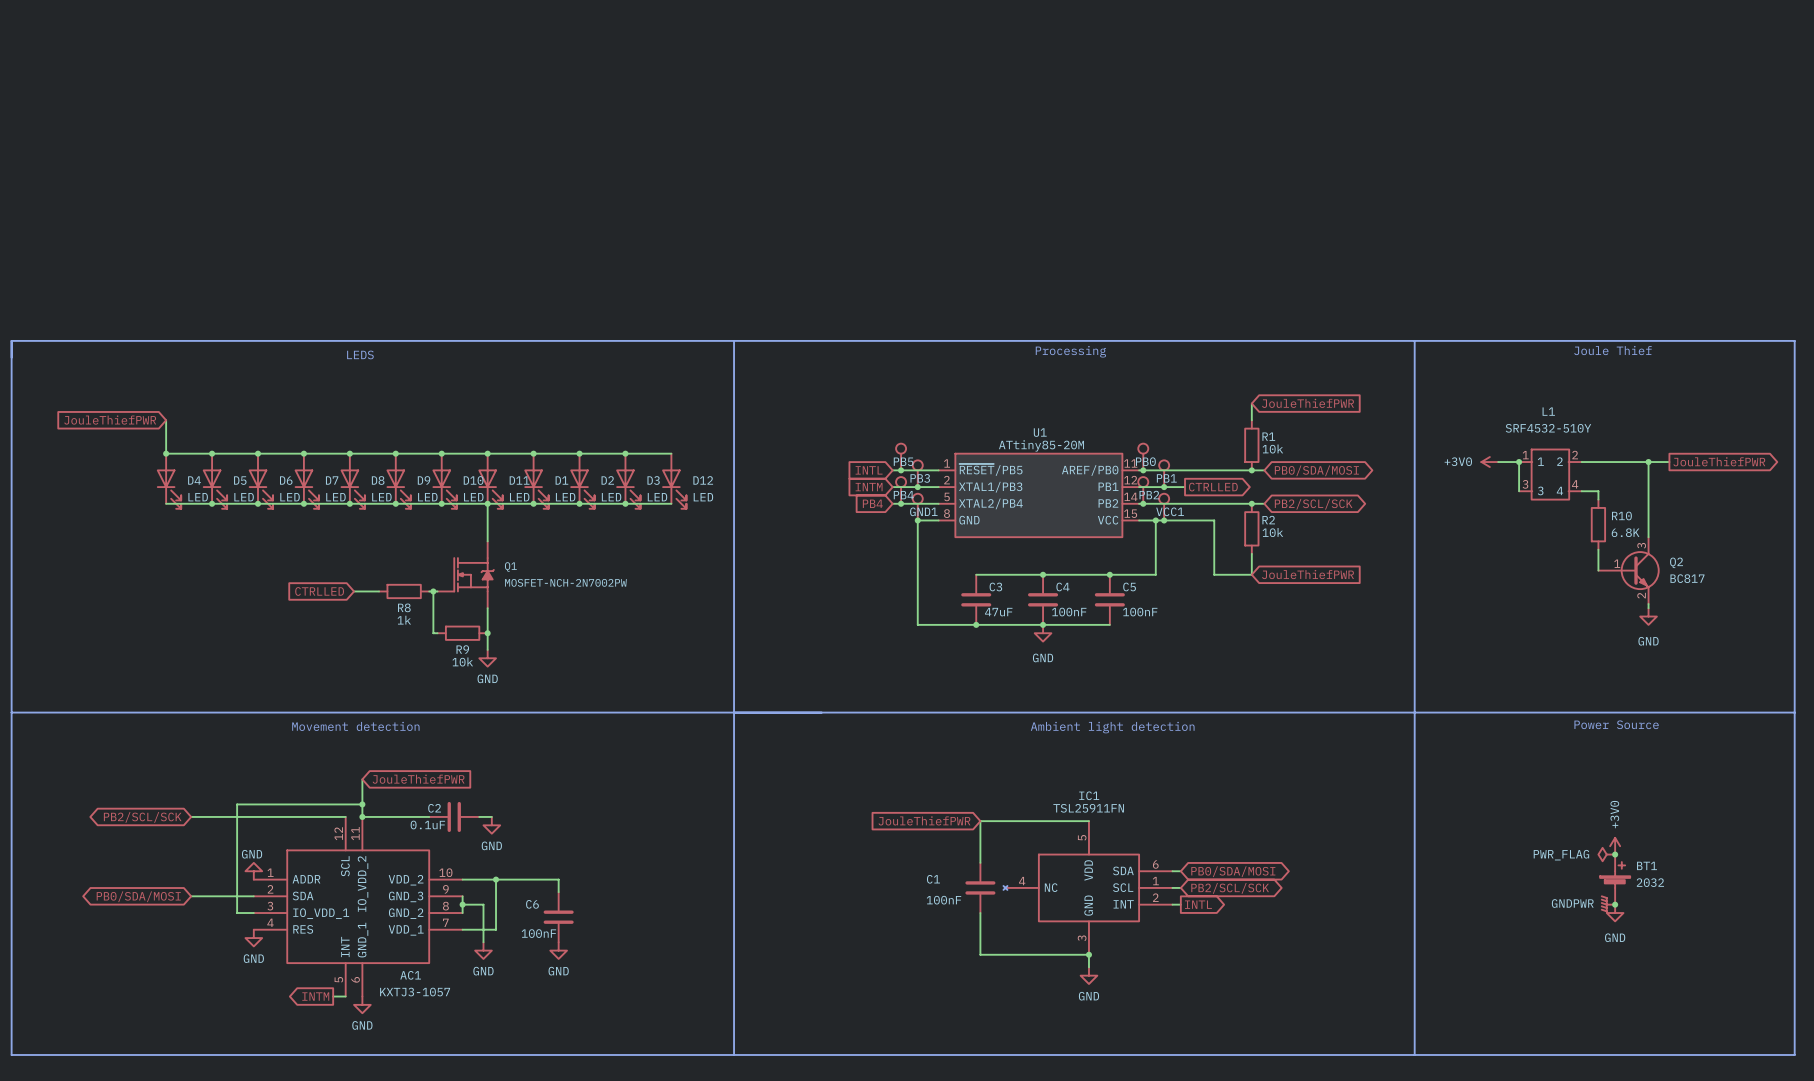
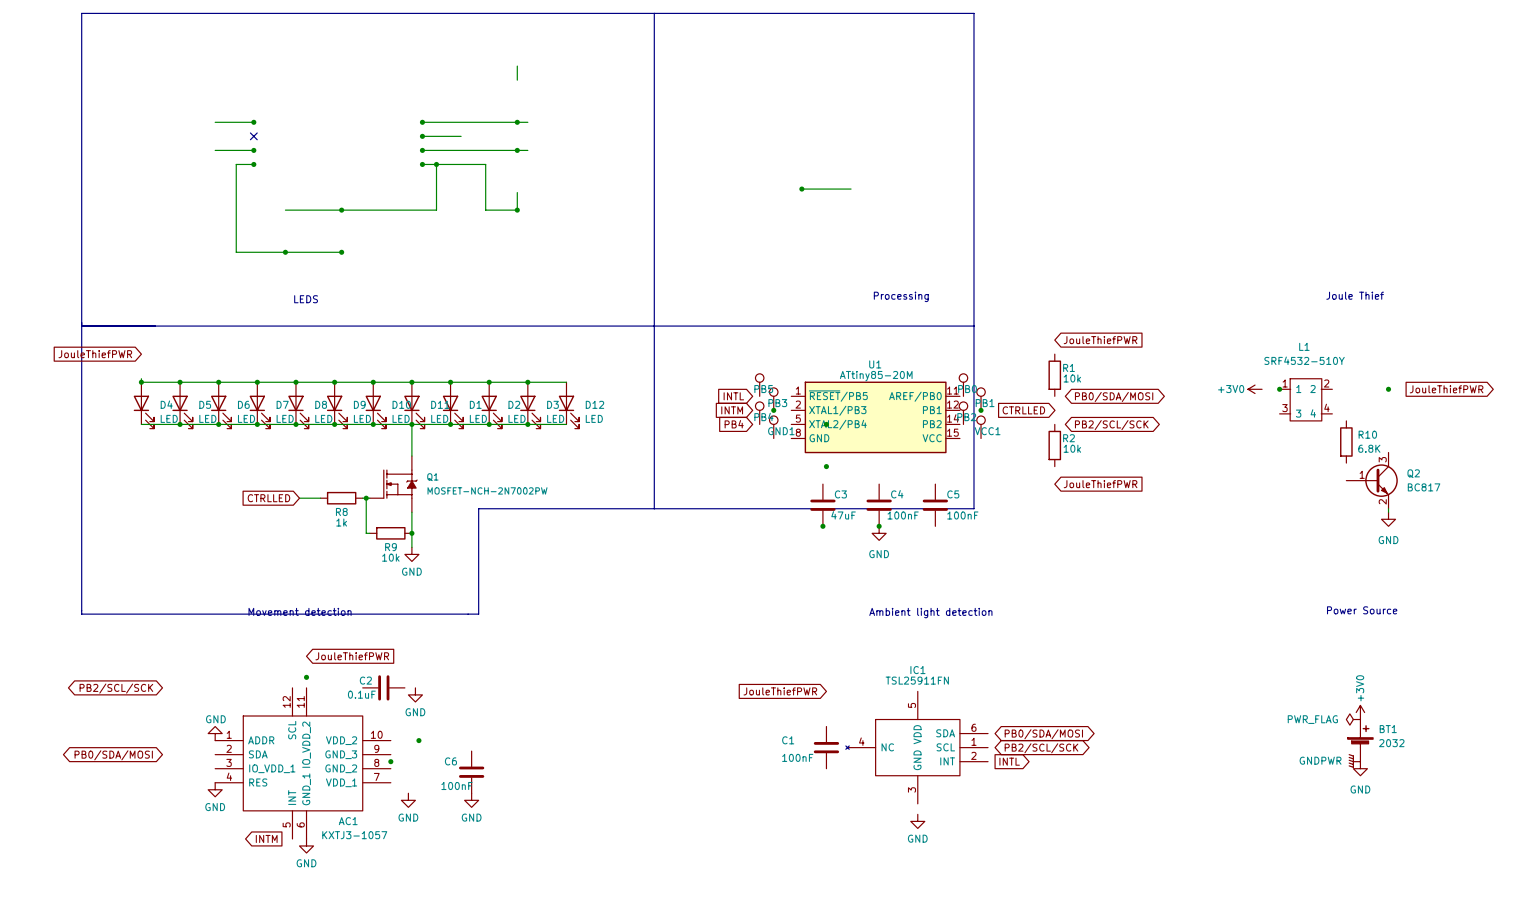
line: none -> (81, 13) (81, 614) (478, 614) (478, 508) (973, 508) (973, 13) (81, 13)
line: none -> (654, 13) (654, 508)
wire: none -> (517, 66) (517, 80)
wire: none -> (215, 122) (253, 122)
junction: none -> (253, 122)
wire: none -> (422, 122) (527, 122)
junction: none -> (422, 122)
junction: none -> (517, 122)
no-connect mark: none -> (253, 136)
wire: none -> (422, 136) (461, 136)
junction: none -> (422, 136)
wire: none -> (215, 150) (253, 150)
junction: none -> (253, 150)
wire: none -> (422, 150) (527, 150)
junction: none -> (422, 150)
junction: none -> (517, 150)
wire: none -> (253, 164) (236, 164) (236, 252) (341, 252)
junction: none -> (253, 164)
wire: none -> (422, 164) (485, 164) (485, 210) (517, 210) (517, 192)
junction: none -> (422, 164)
wire: none -> (436, 164) (436, 210) (285, 210)
junction: none -> (436, 164)
wire: none -> (801, 189) (851, 189)
junction: none -> (801, 189)
junction: none -> (341, 210)
junction: none -> (517, 210)
junction: none -> (285, 252)
junction: none -> (341, 252)
line: (11, 340) (11, 1054) (1794, 1054) (1794, 340) (11, 340) -> none
line: (734, 340) (734, 1054) -> none
line: (1414, 340) (1414, 1054) -> none
line: none -> (81, 326) (973, 326)
wire: (1251, 403) (1251, 420) -> none
wire: (166, 420) (166, 449) -> none
wire: (1498, 462) (1519, 462) (1519, 491) -> none
wire: (1581, 462) (1669, 462) -> none
wire: (1648, 462) (1648, 537) -> none
wire: (892, 470) (938, 470) -> none
junction: (901, 470) -> none
wire: (1139, 470) (1264, 470) -> none
junction: (1143, 470) -> none
junction: (1251, 470) -> none
wire: (892, 487) (938, 487) -> none
wire: (1139, 487) (1185, 487) -> none
wire: (1581, 491) (1598, 491) (1598, 499) -> none
wire: (892, 503) (938, 503) -> none
junction: (901, 503) -> none
junction: none -> (826, 424)
wire: (1139, 503) (1264, 503) -> none
junction: (1143, 503) -> none
junction: (1251, 503) -> none
junction: (917, 520) -> none
wire: (938, 520) (917, 520) (917, 624) (1109, 624) -> none
wire: (1139, 520) (1214, 520) (1214, 574) (1251, 574) (1251, 553) -> none
wire: (1155, 520) (1155, 574) (976, 574) -> none
junction: (1155, 520) -> none
junction: (1164, 520) -> none
wire: (1598, 549) (1598, 570) -> none
junction: none -> (826, 466)
junction: (1043, 574) -> none
junction: (1109, 574) -> none
line: (11, 712) (1794, 712) -> none
wire: (362, 779) (362, 816) (429, 816) -> none
wire: (362, 804) (237, 804) (237, 913) (253, 913) -> none
wire: (191, 816) (345, 816) -> none
junction: (362, 816) -> none
wire: (479, 816) (491, 816) -> none
wire: (1088, 821) (980, 821) (980, 862) -> none
junction: (1615, 854) -> none
wire: (1172, 871) (1180, 871) -> none
wire: (462, 879) (558, 879) (558, 892) -> none
wire: (496, 879) (496, 929) (462, 929) -> none
wire: (1172, 887) (1180, 887) -> none
wire: (191, 896) (253, 896) -> none
wire: (462, 896) (462, 913) -> none
wire: (462, 904) (483, 904) (483, 942) -> none
wire: (1172, 904) (1180, 904) -> none
junction: (1615, 904) -> none
wire: (980, 913) (980, 954) (1088, 954) (1088, 967) -> none
junction: (1088, 954) -> none
wire: (333, 996) (345, 996) -> none

